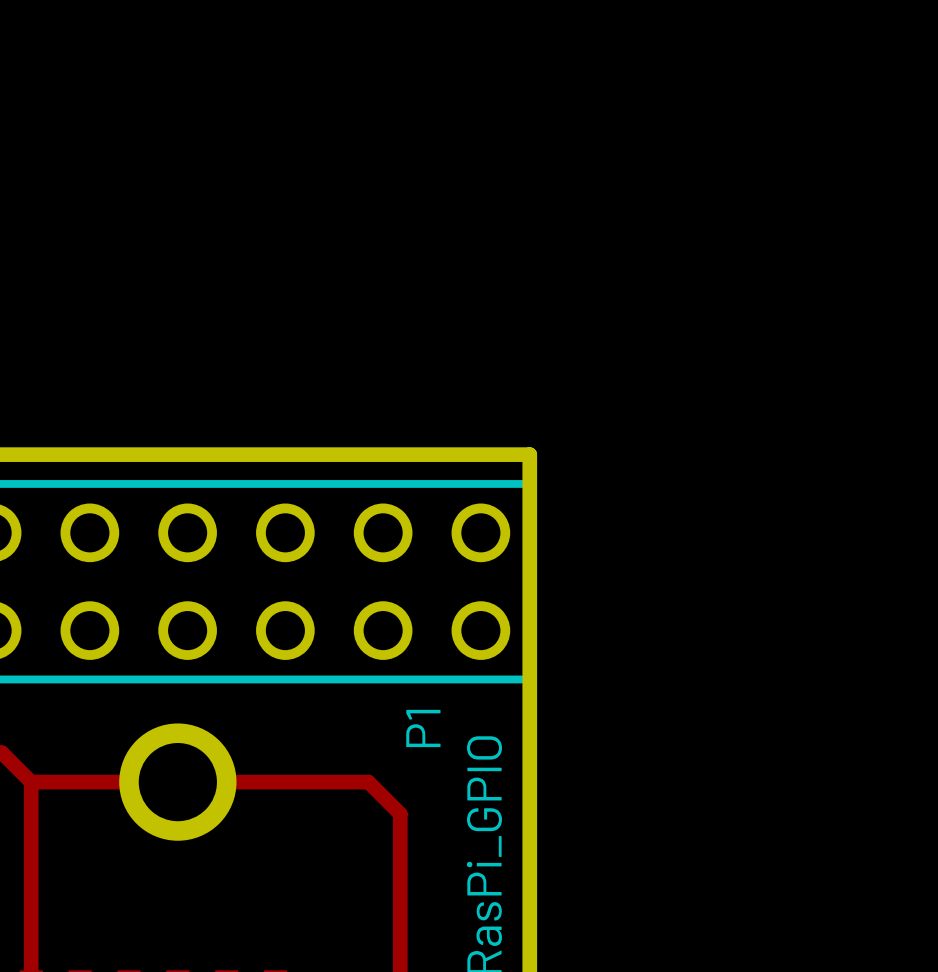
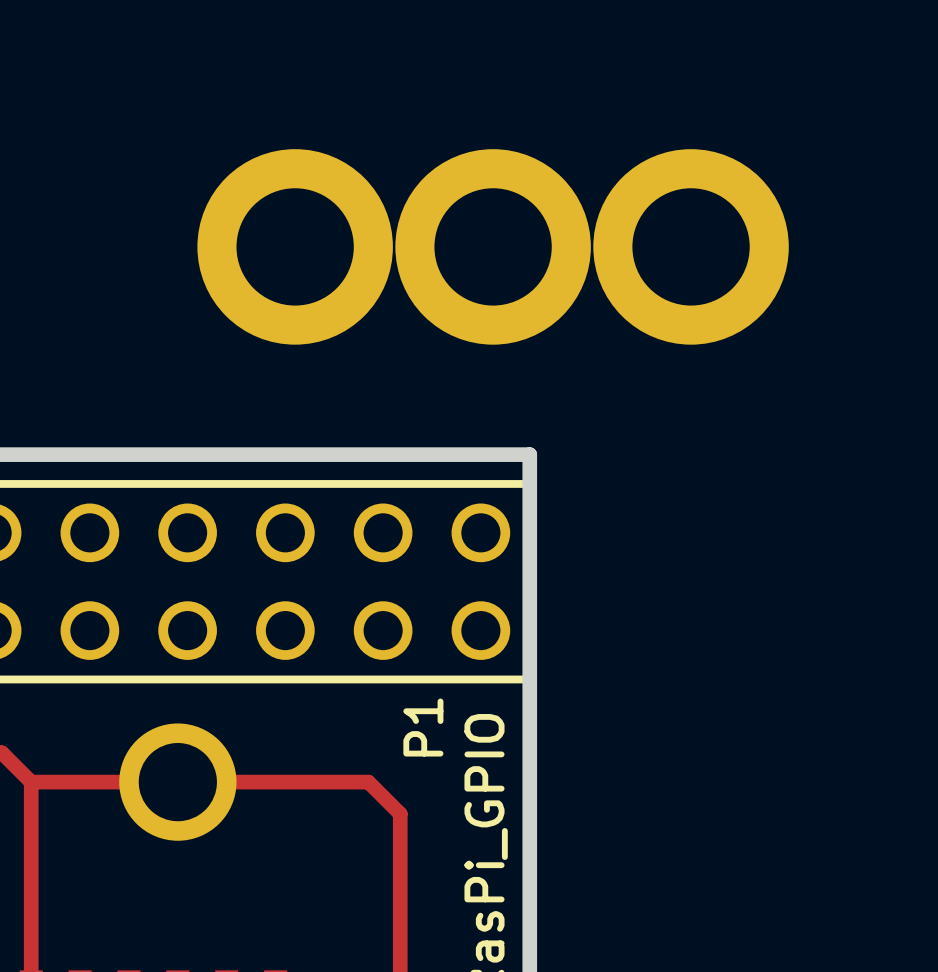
part: none -> (295, 246)
part: none -> (493, 246)
part: none -> (691, 246)

